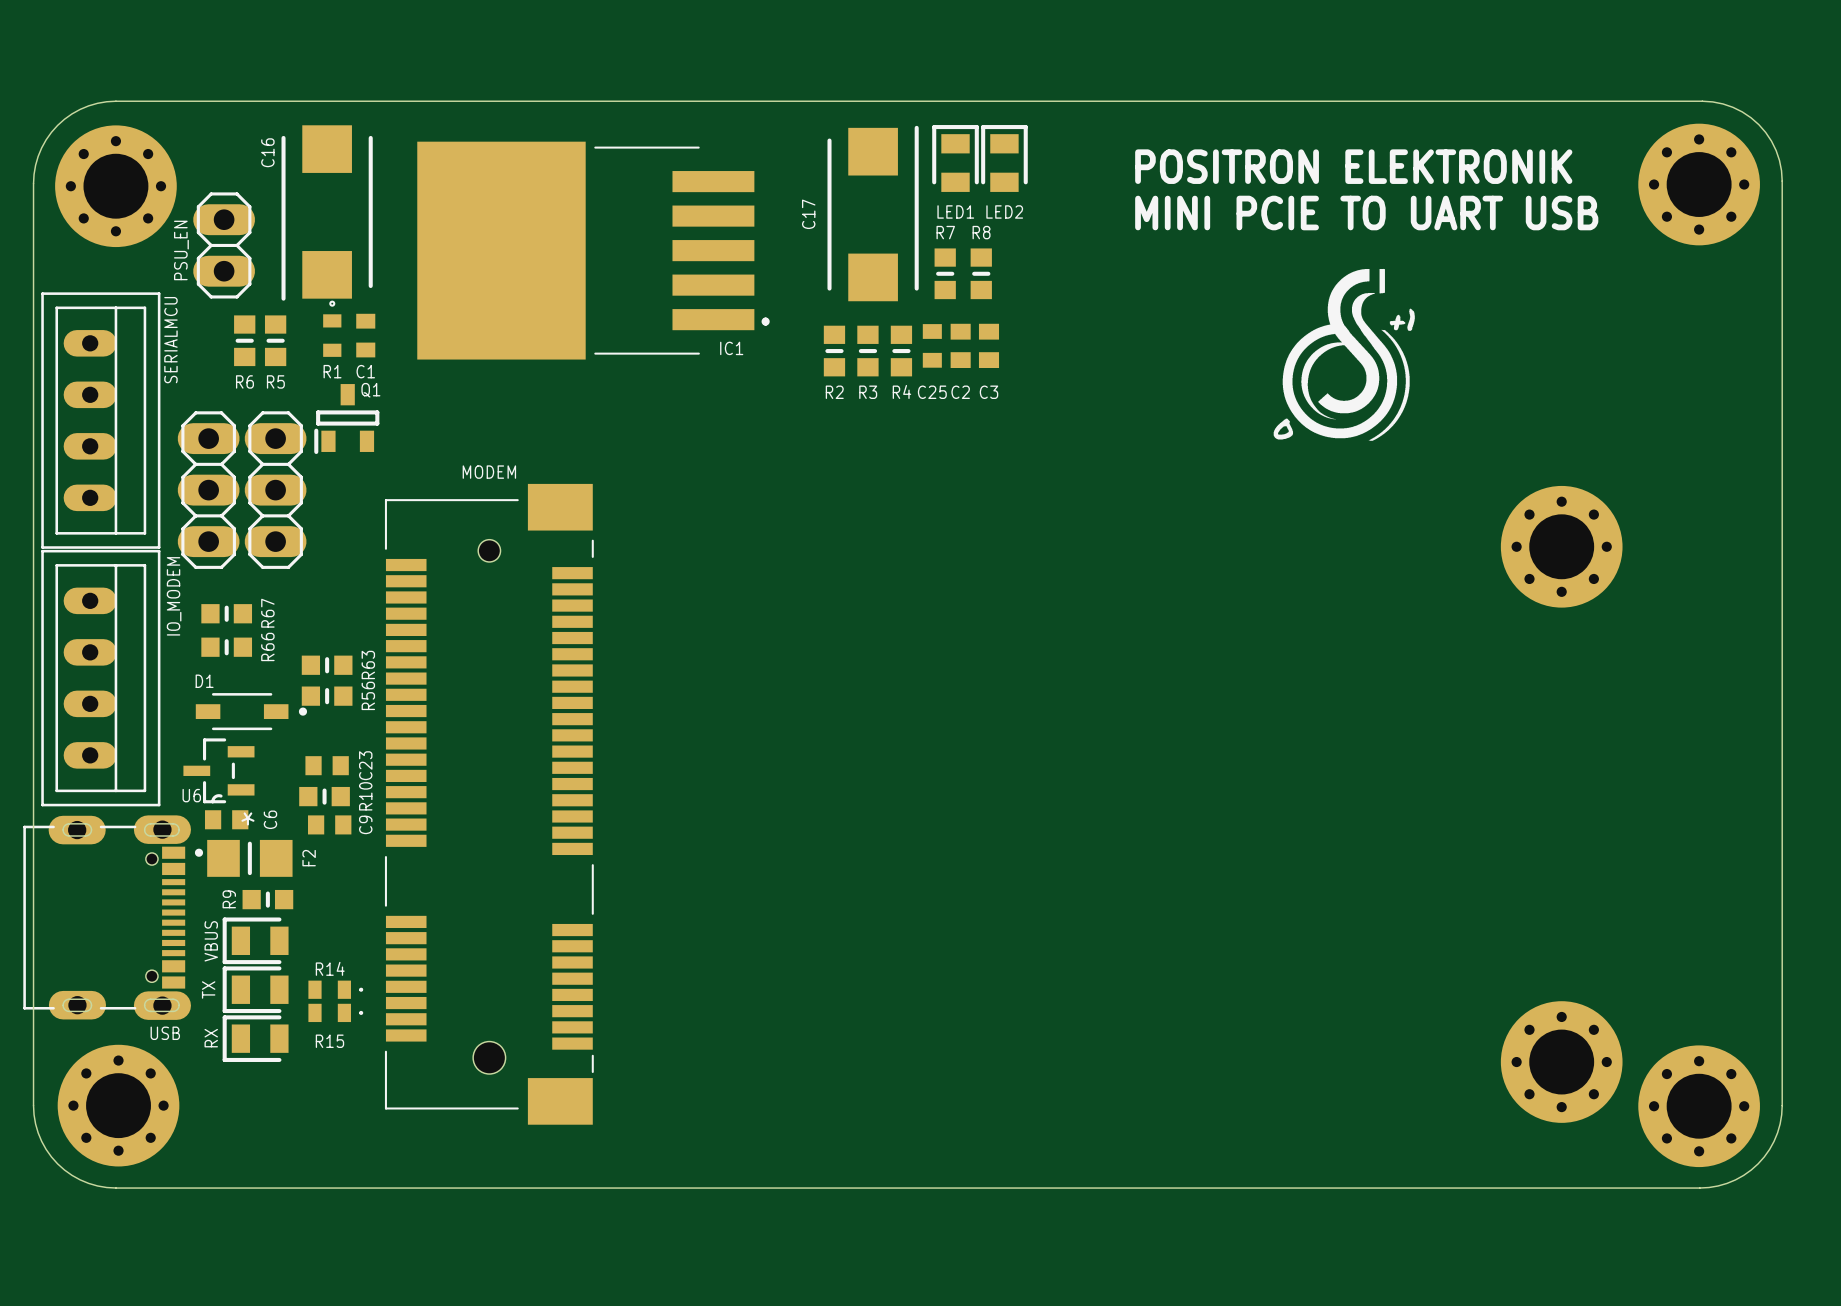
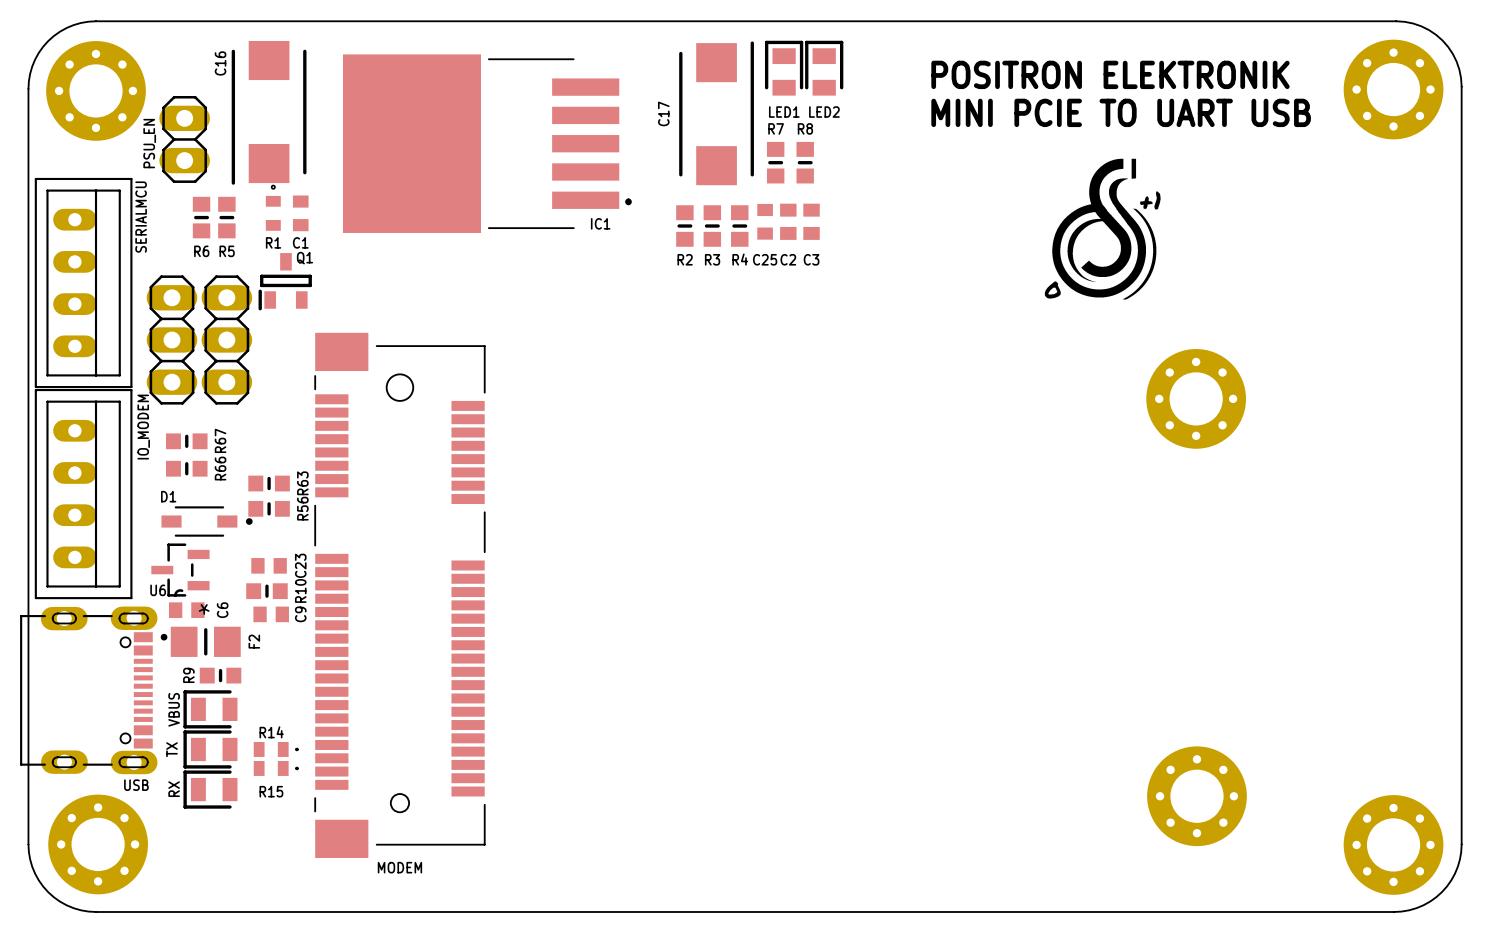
part position: (1561, 546) -> (1196, 398)
MODEM rotation: 0° (489, 804) -> 180° (399, 595)
part position: (1561, 1062) -> (1196, 796)

